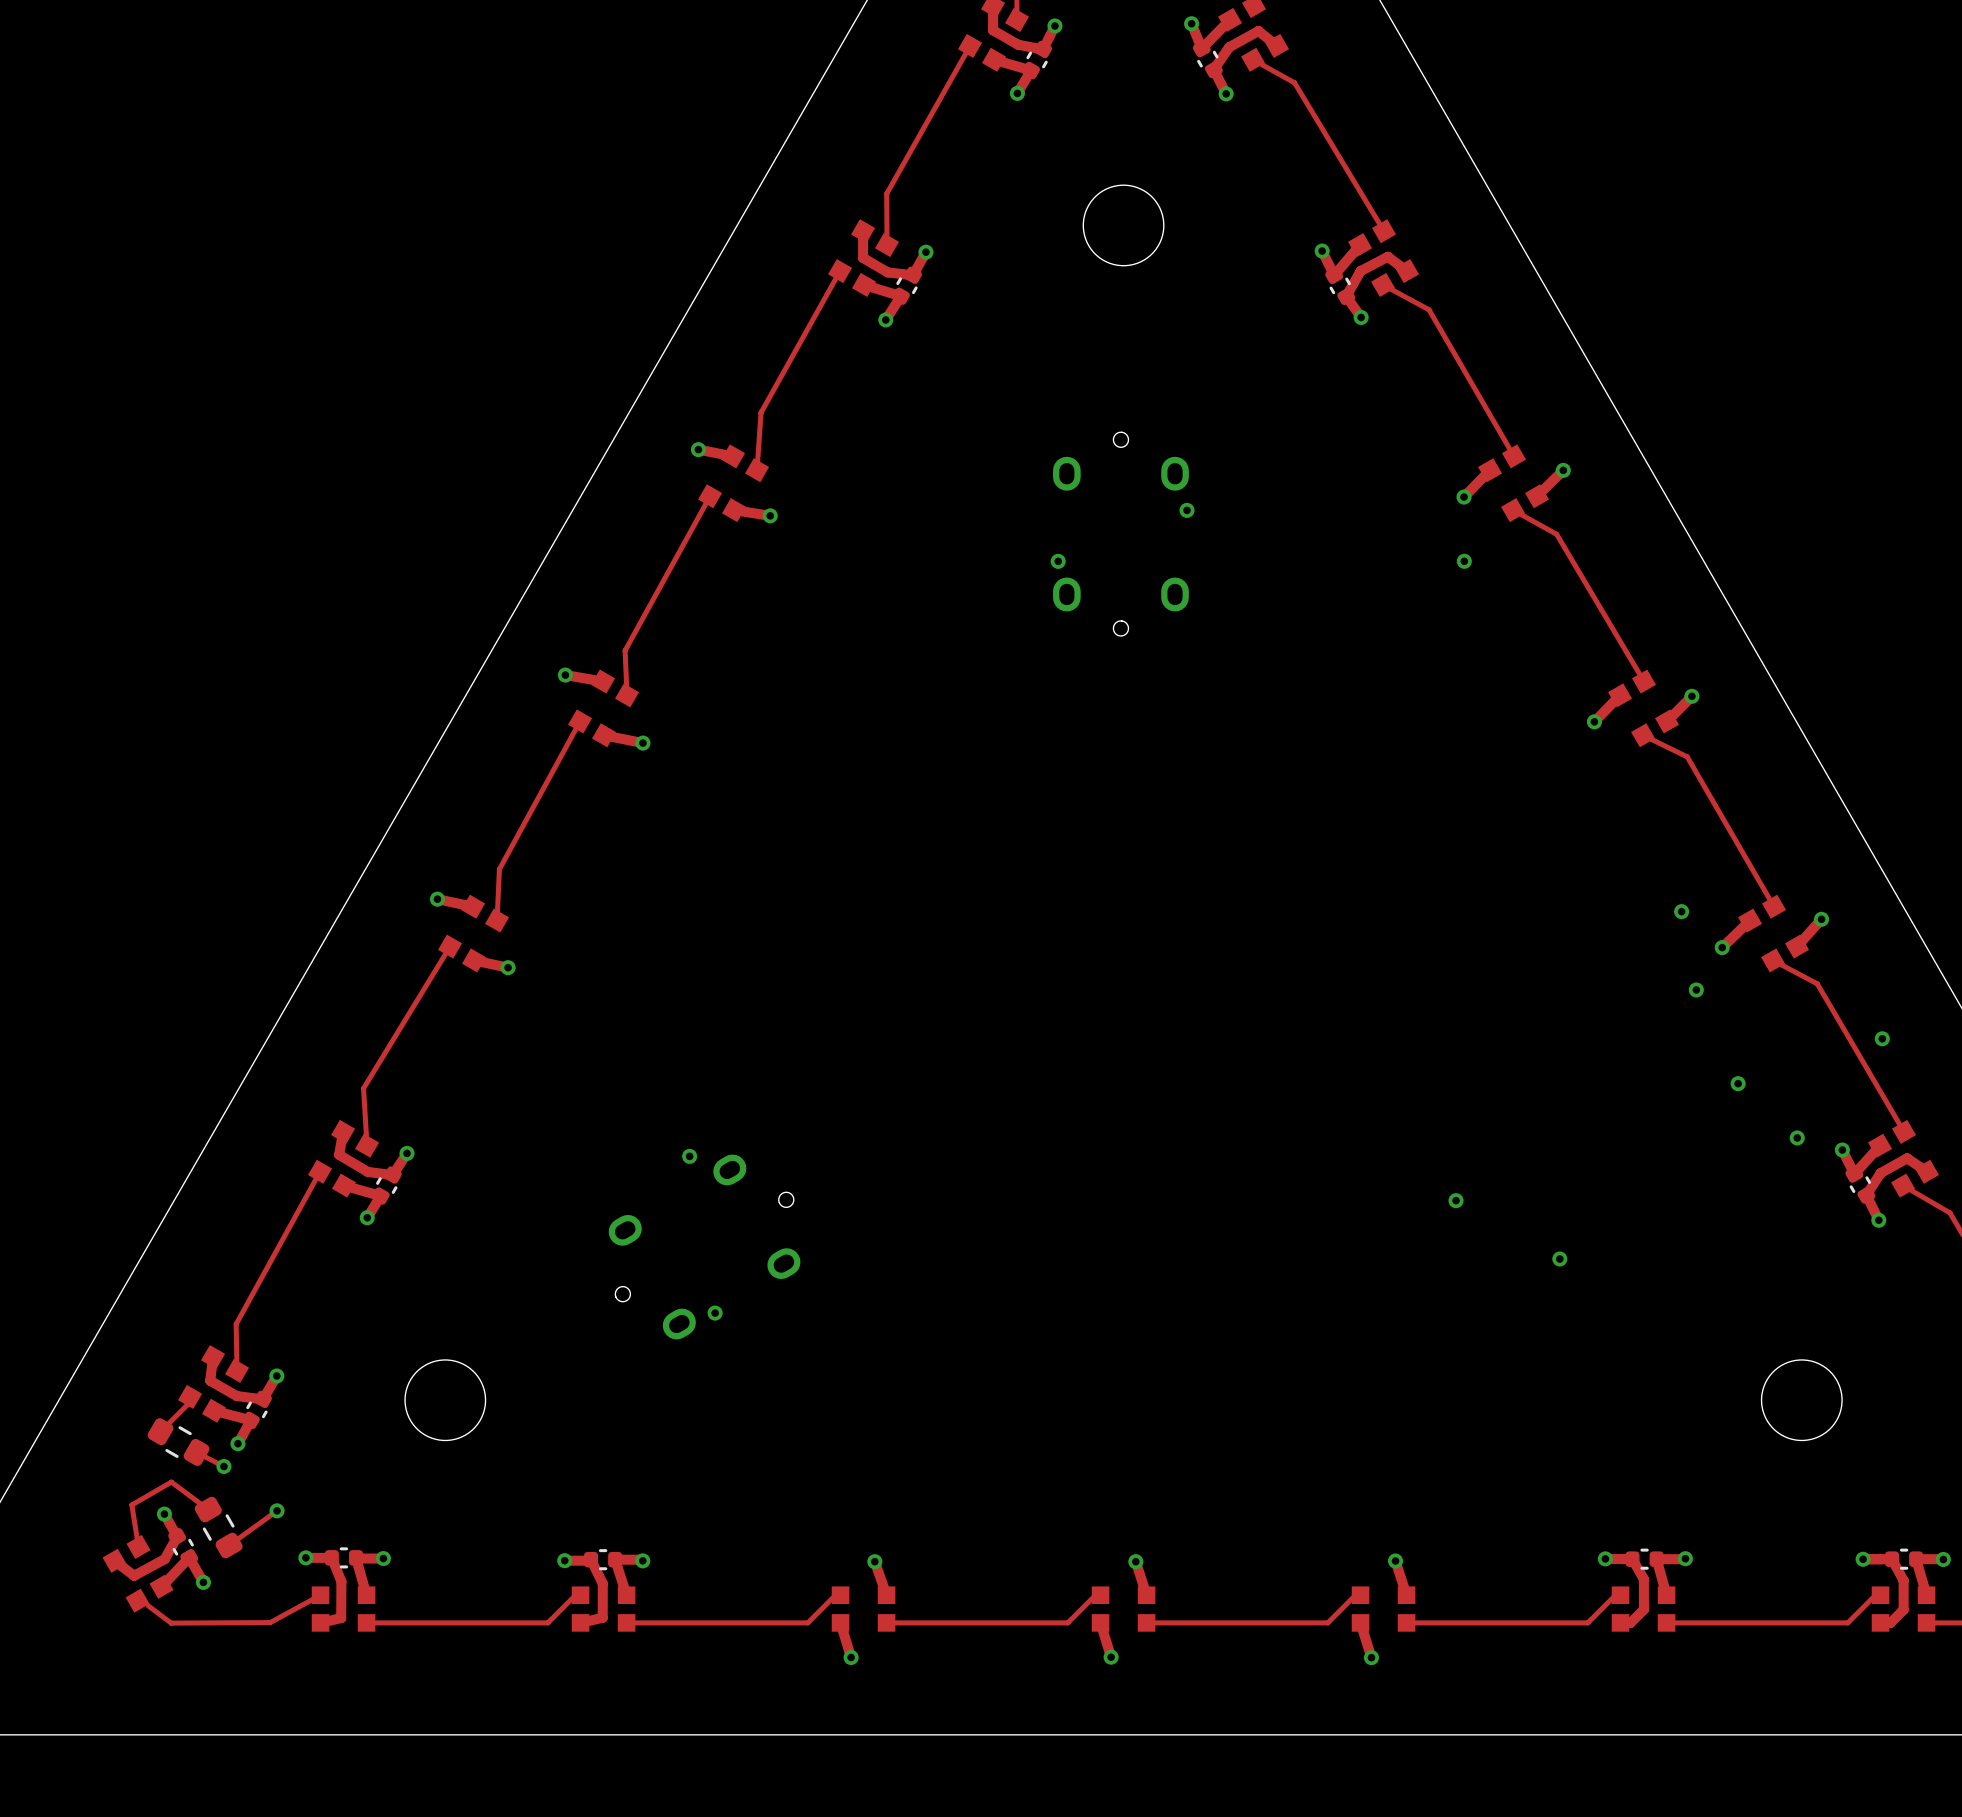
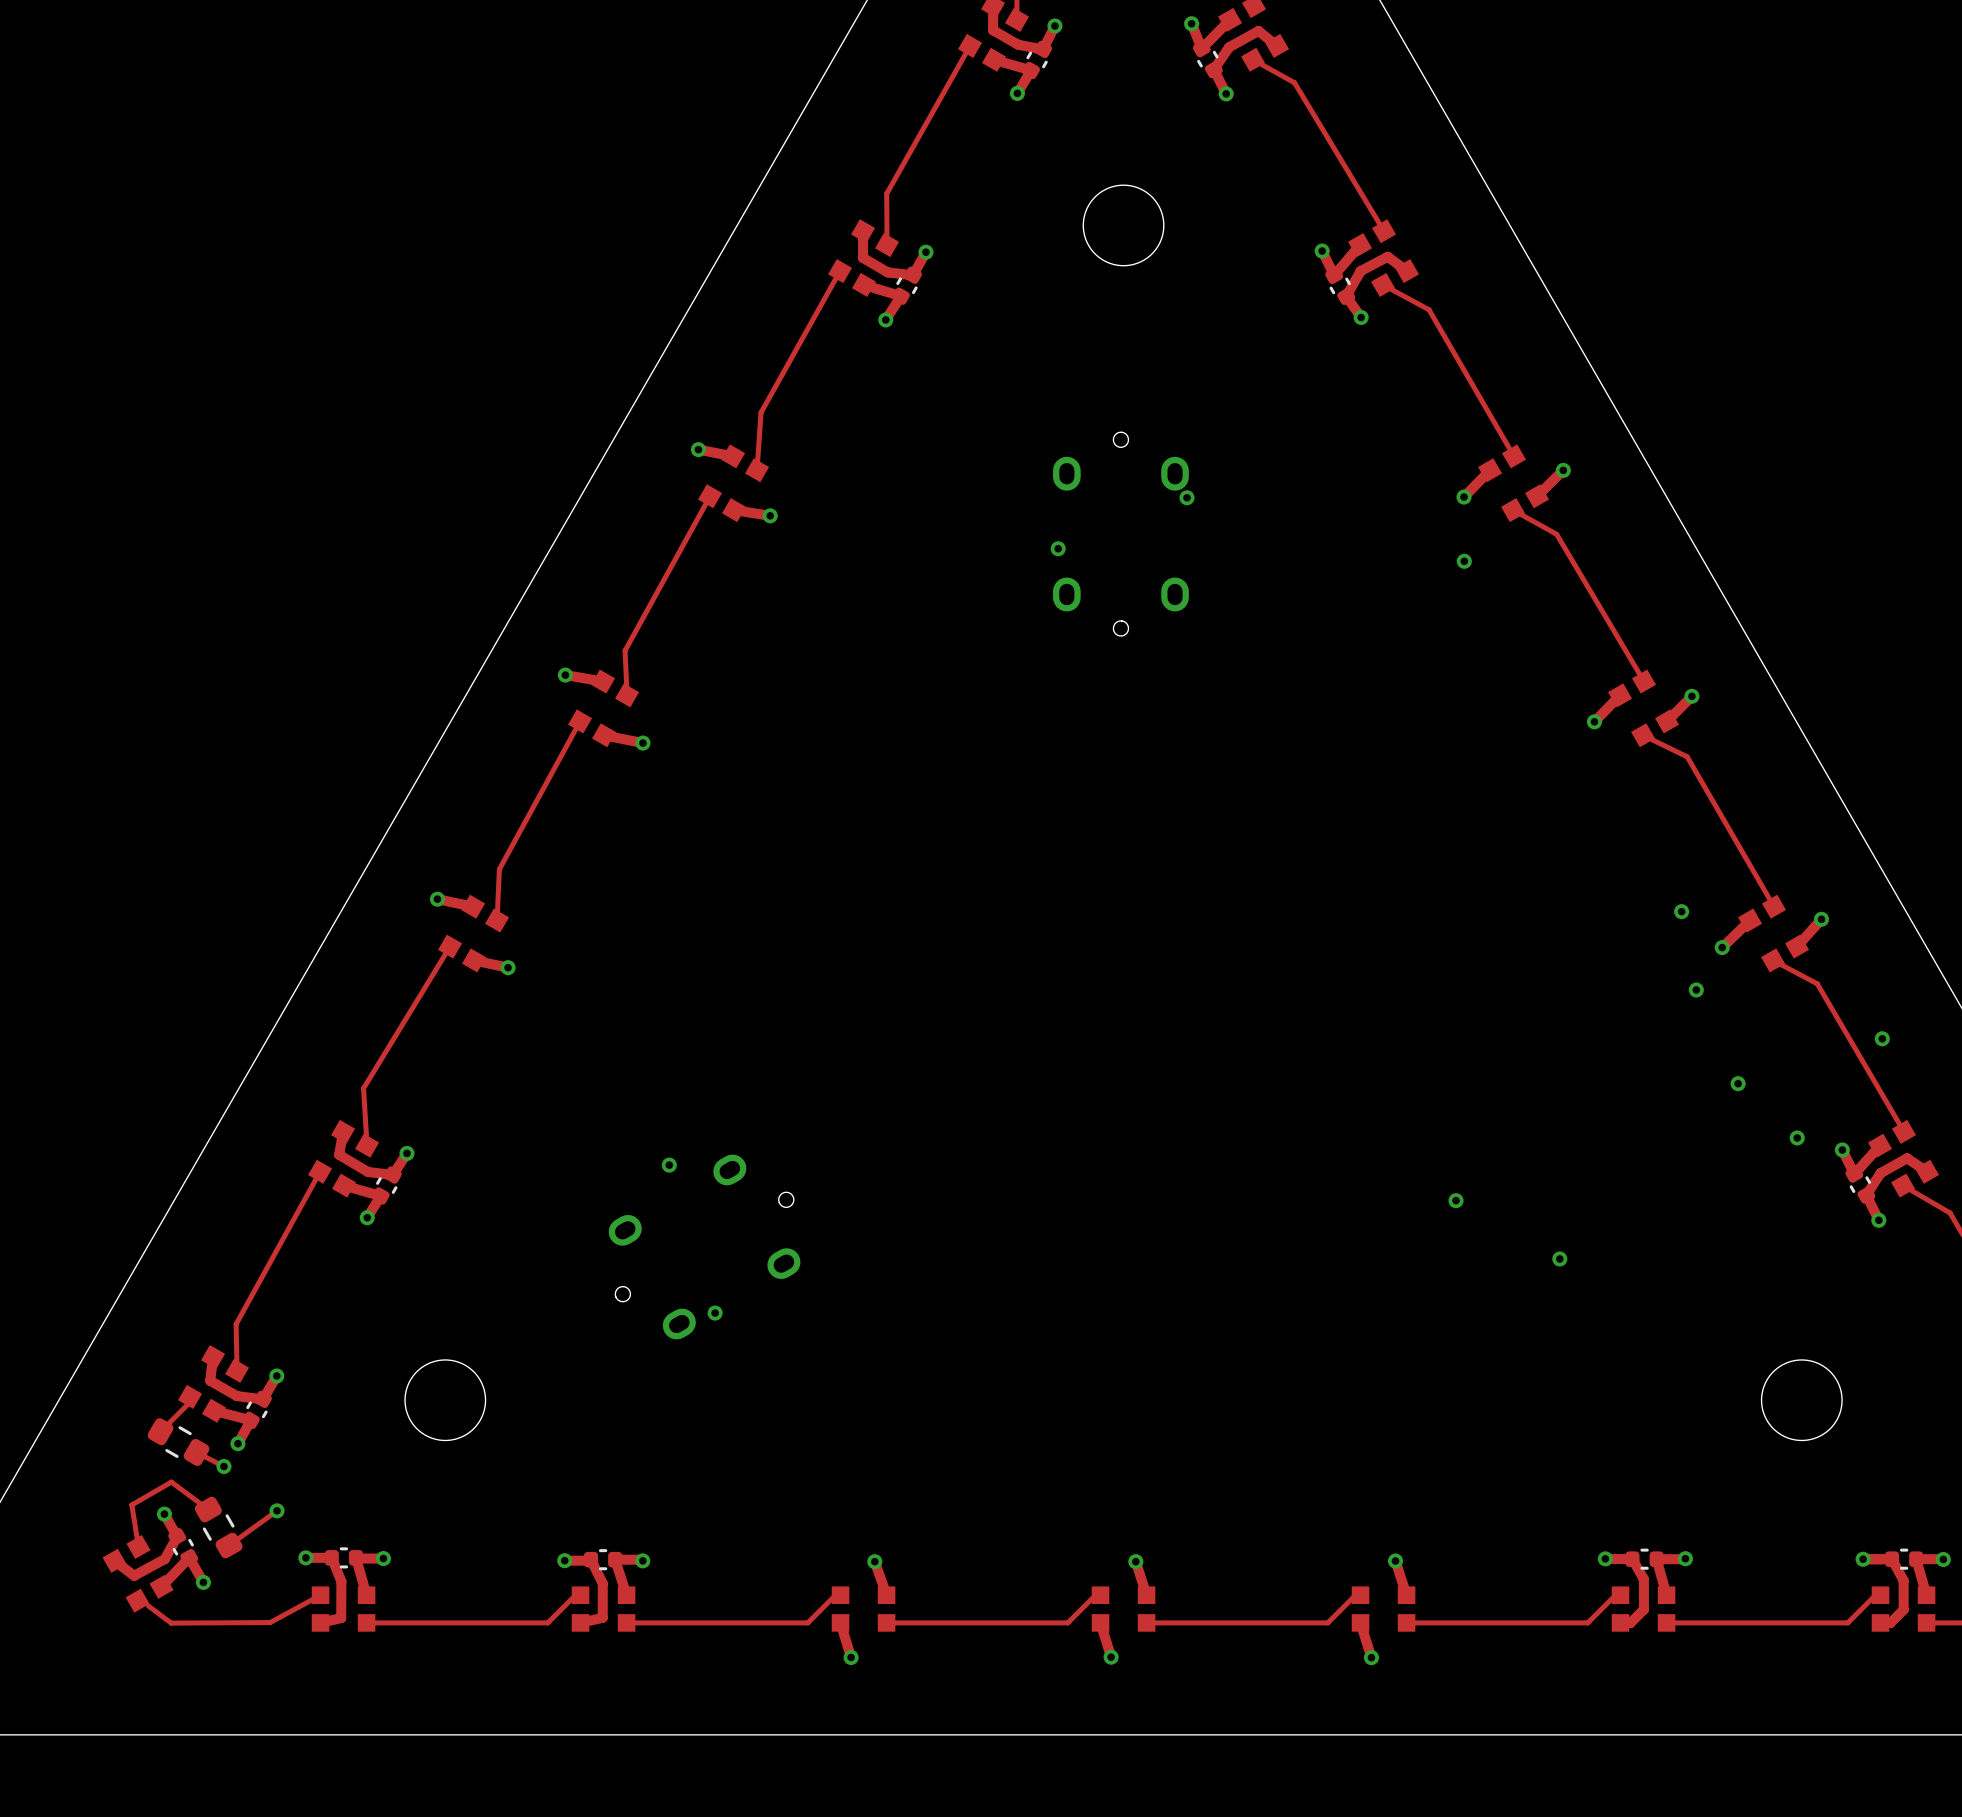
via position: (1187, 510) -> (1187, 497)
via position: (1058, 561) -> (1058, 548)
via position: (689, 1156) -> (669, 1165)

